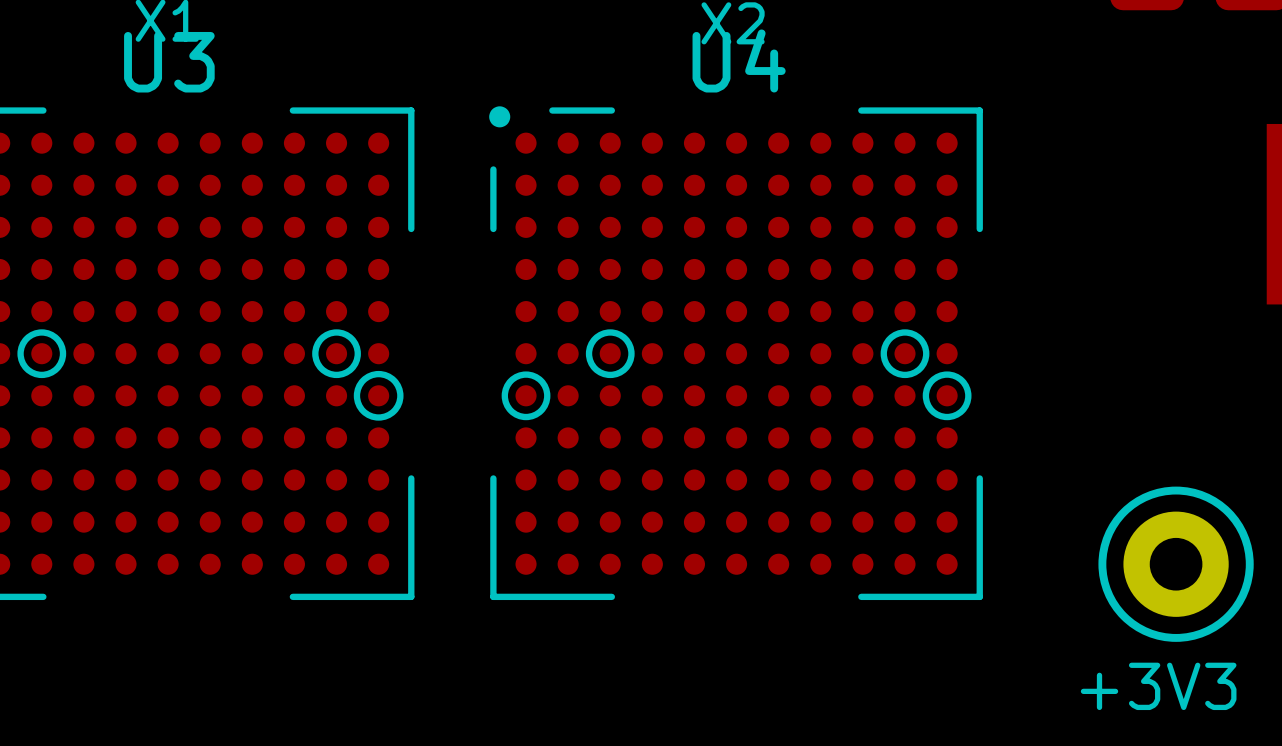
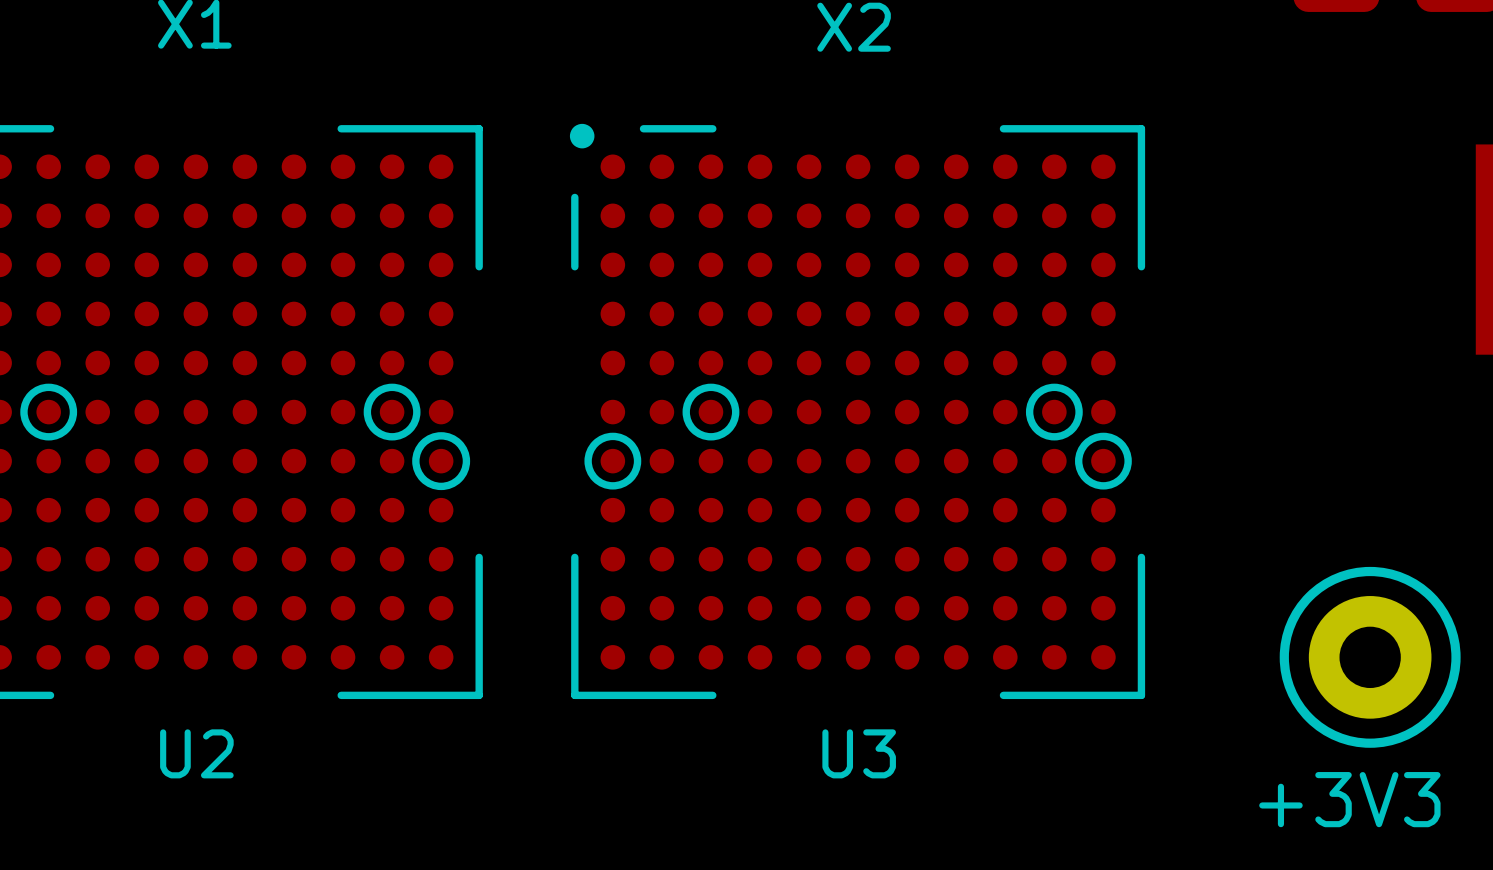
U4 name: U4 (739, 60) -> U3 (859, 753)
U3 name: U3 (169, 62) -> U2 (196, 753)

